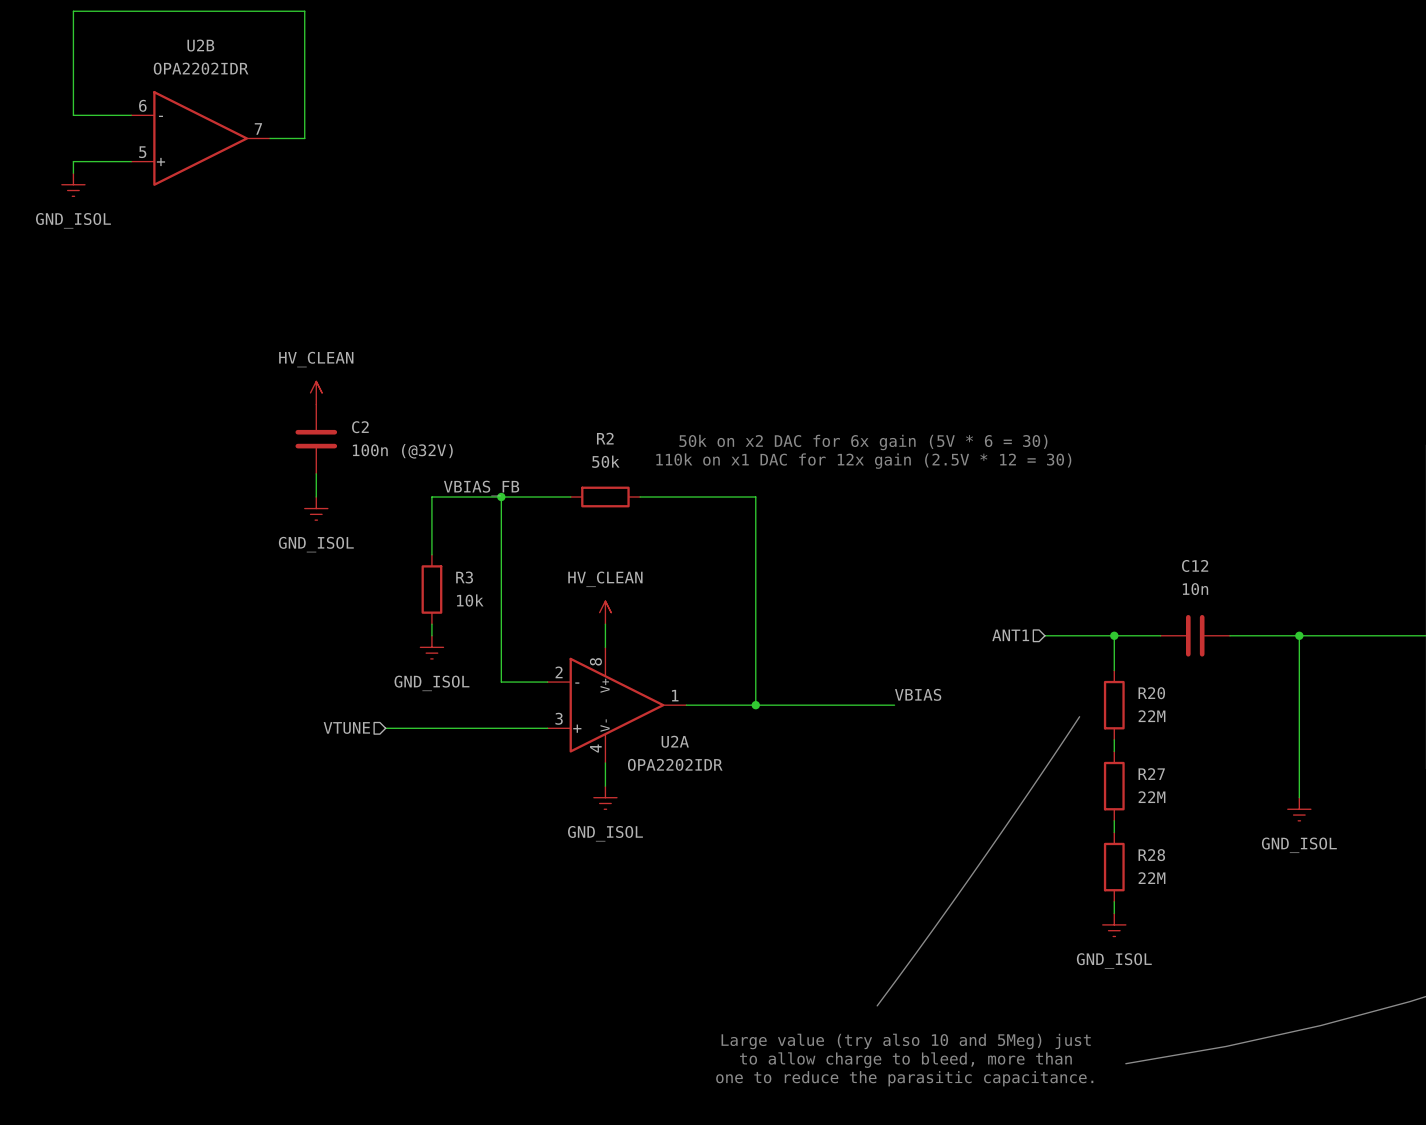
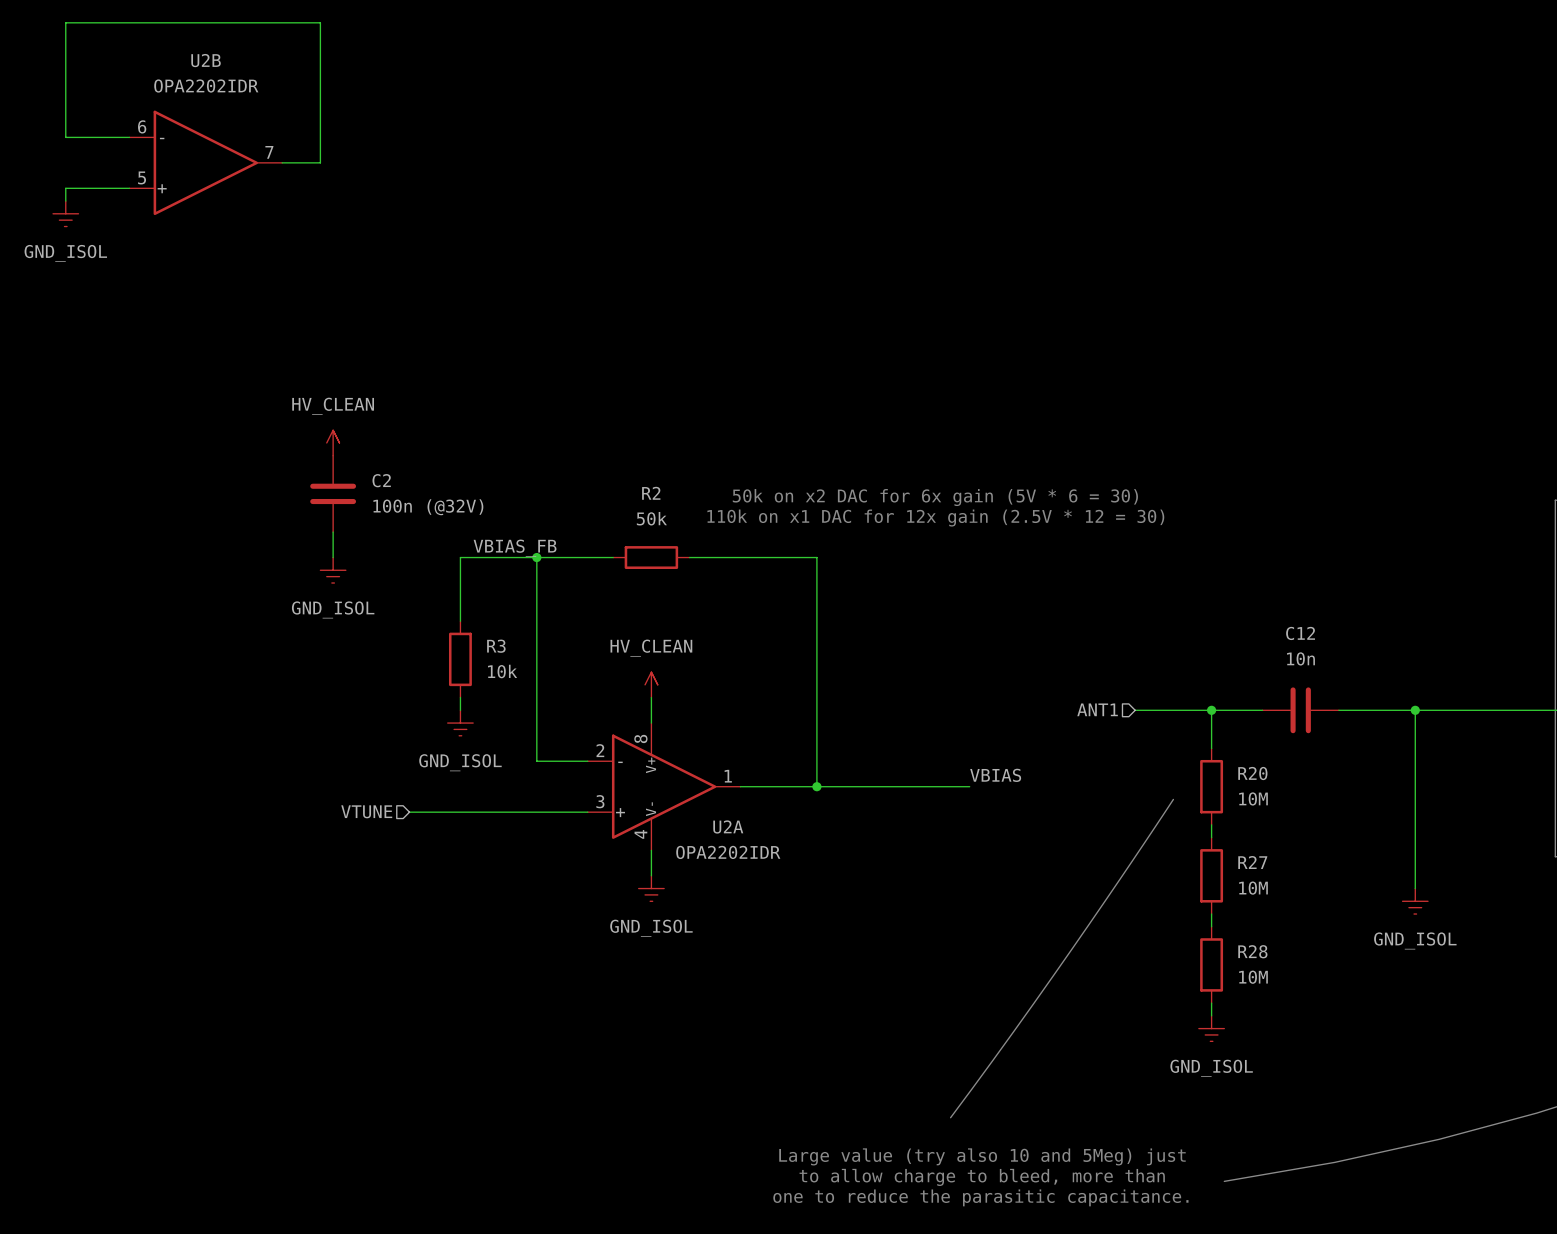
R20 value: 22M (1151, 716) -> 10M (1253, 798)
R27 value: 22M (1151, 797) -> 10M (1253, 888)
R28 value: 22M (1151, 878) -> 10M (1253, 977)

